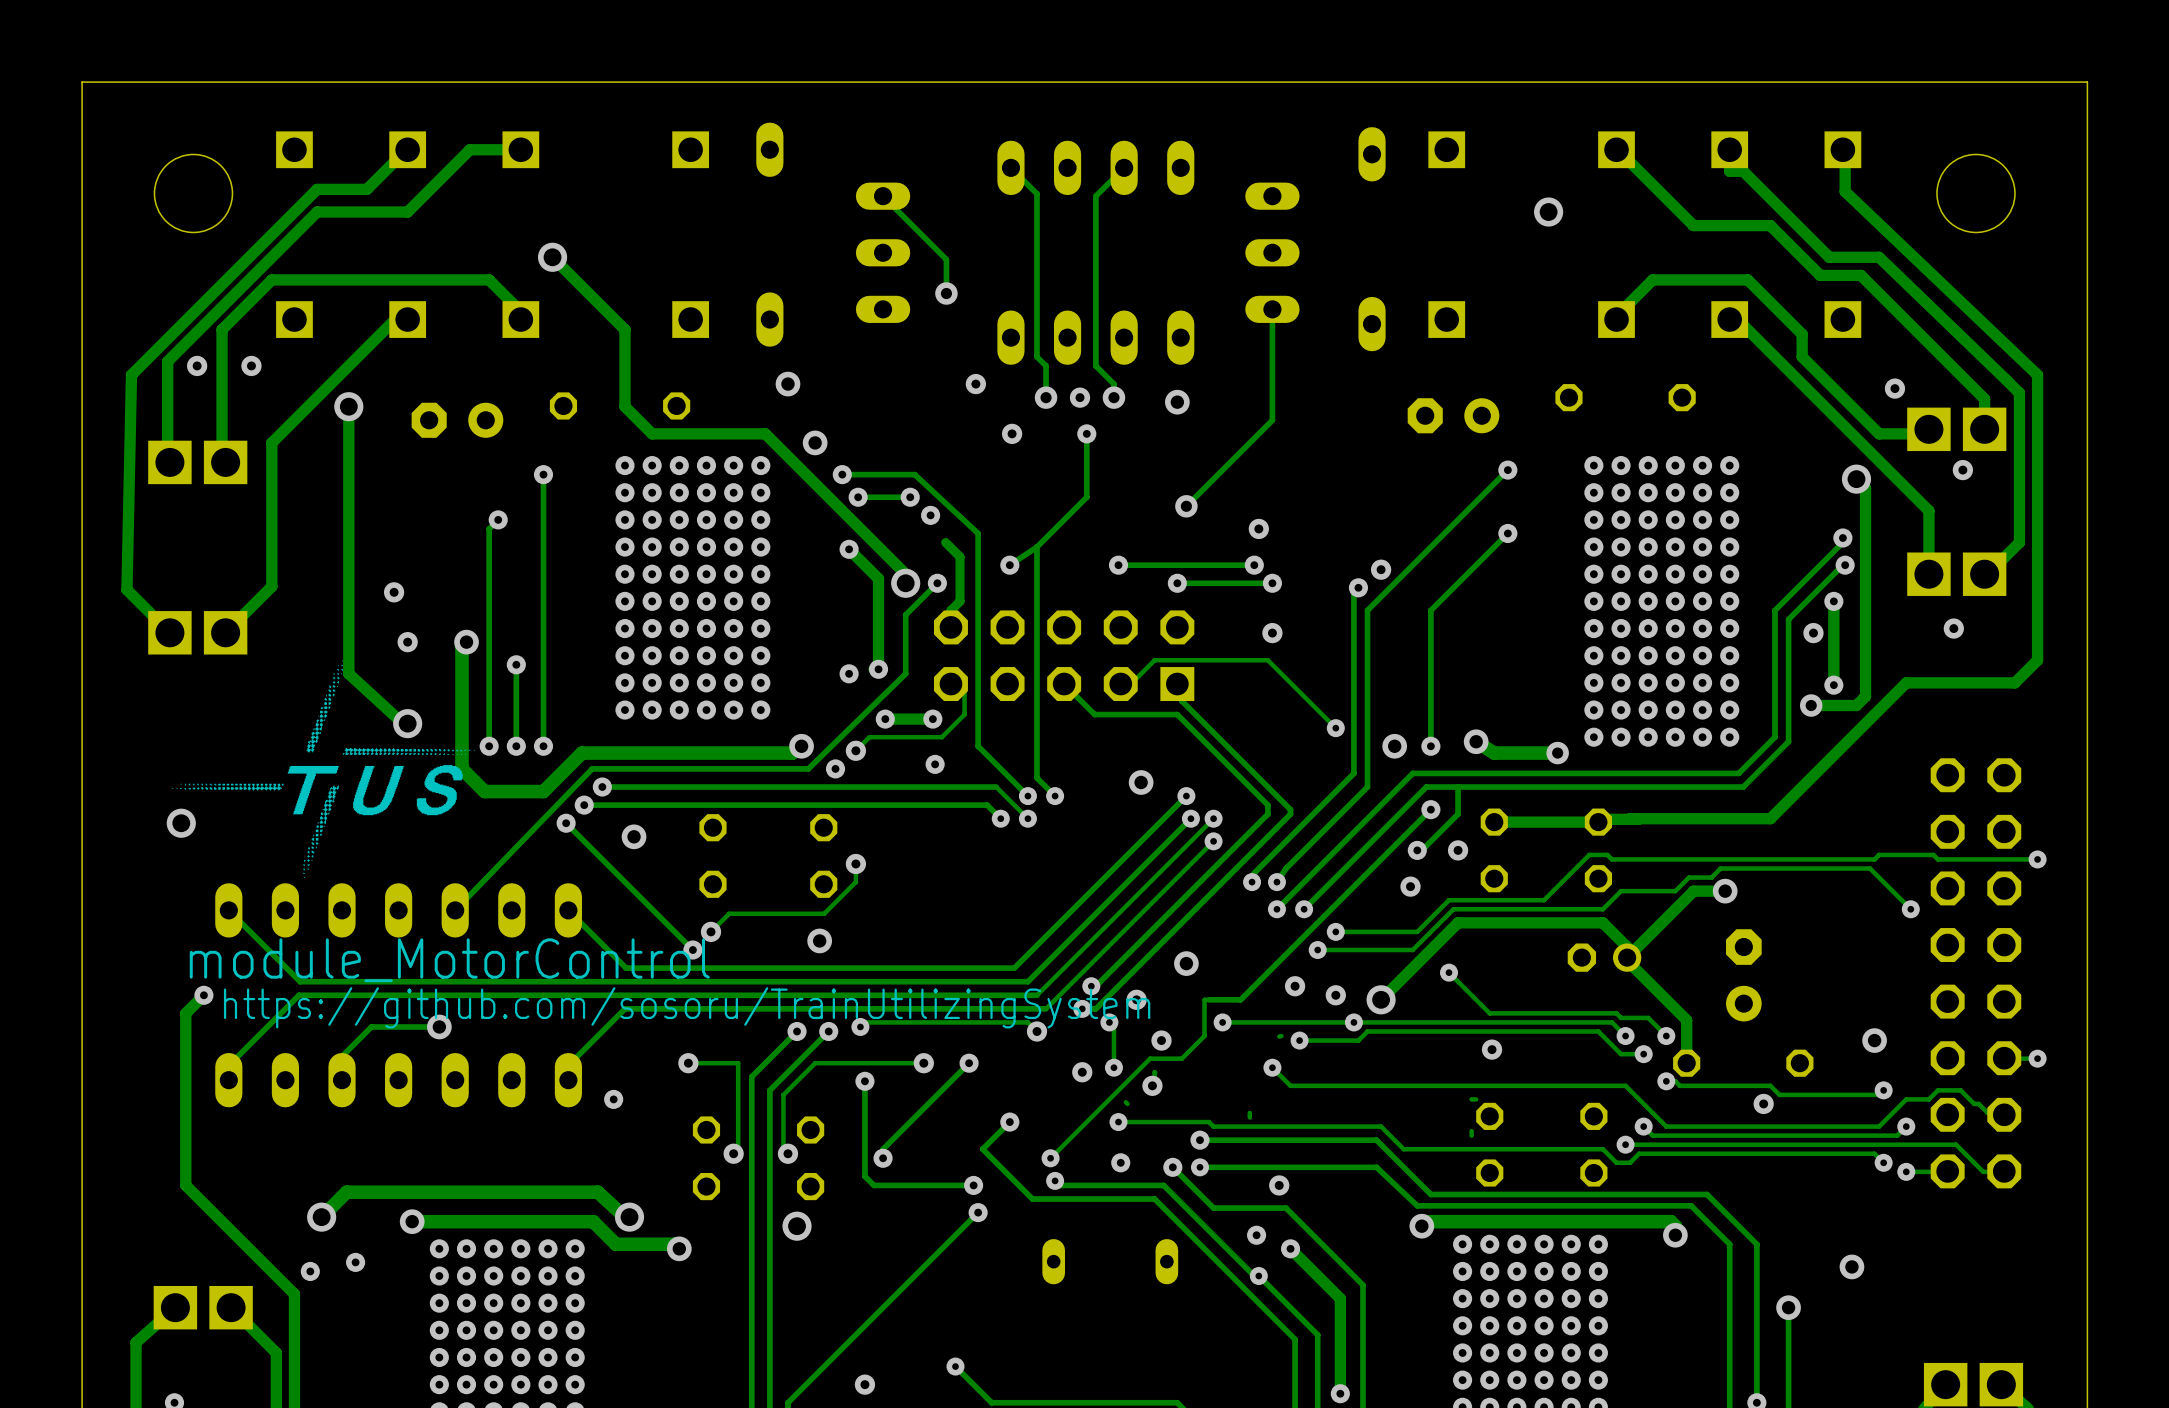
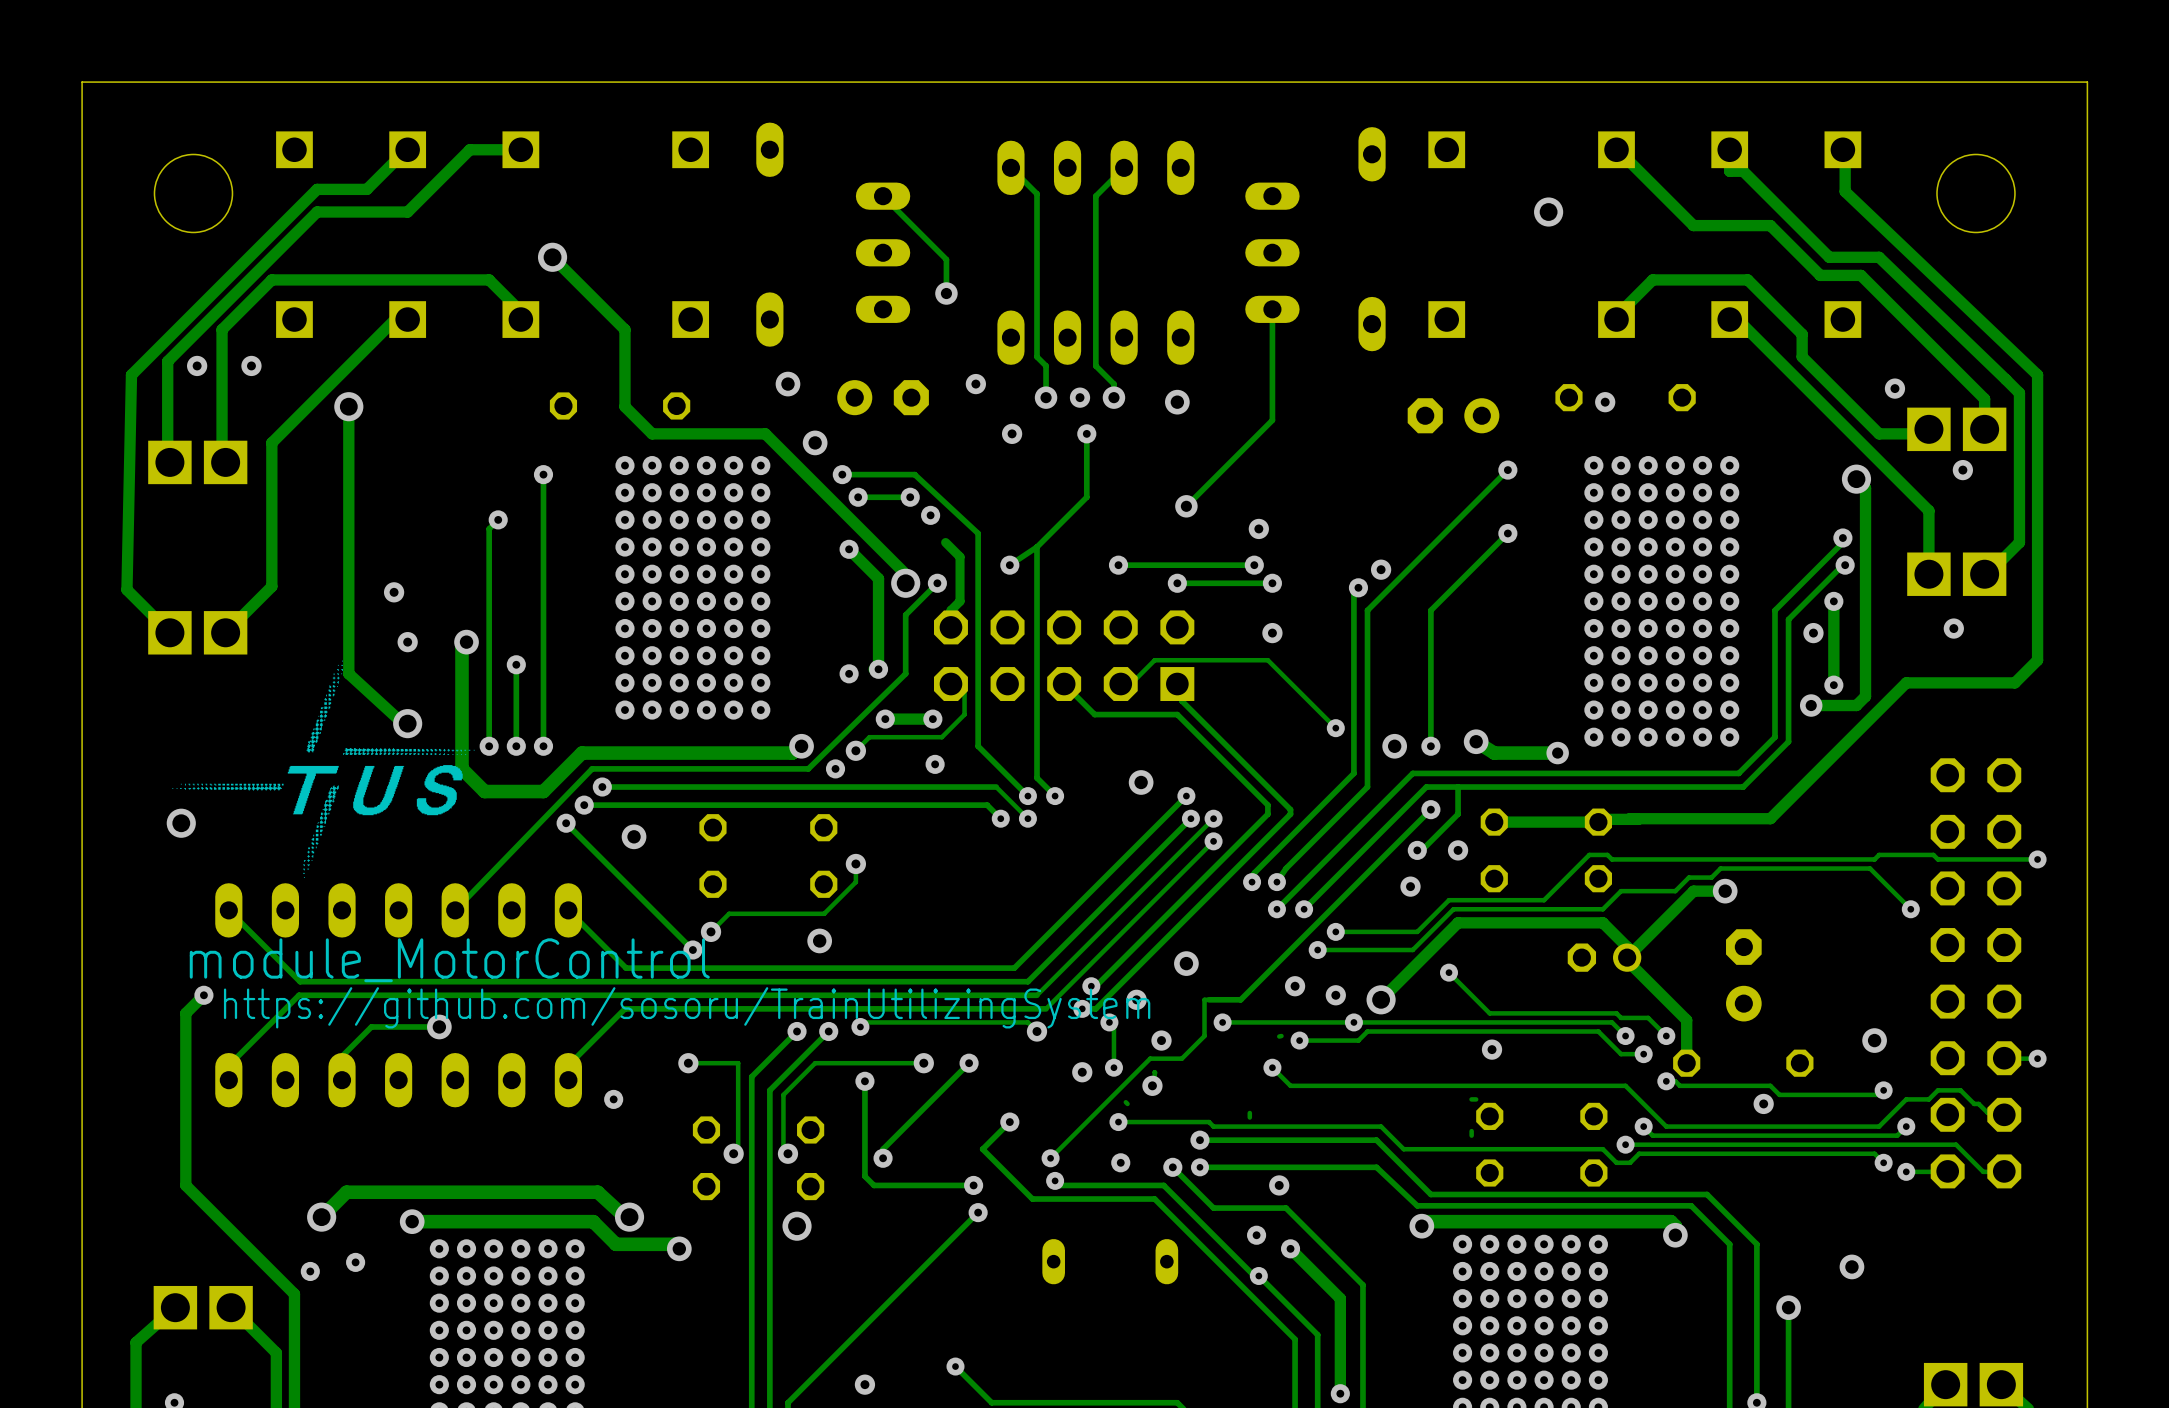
via: none -> (1605, 402)
part rotation: 0° (457, 420) -> 180° (883, 397)
part position: (457, 420) -> (883, 397)

